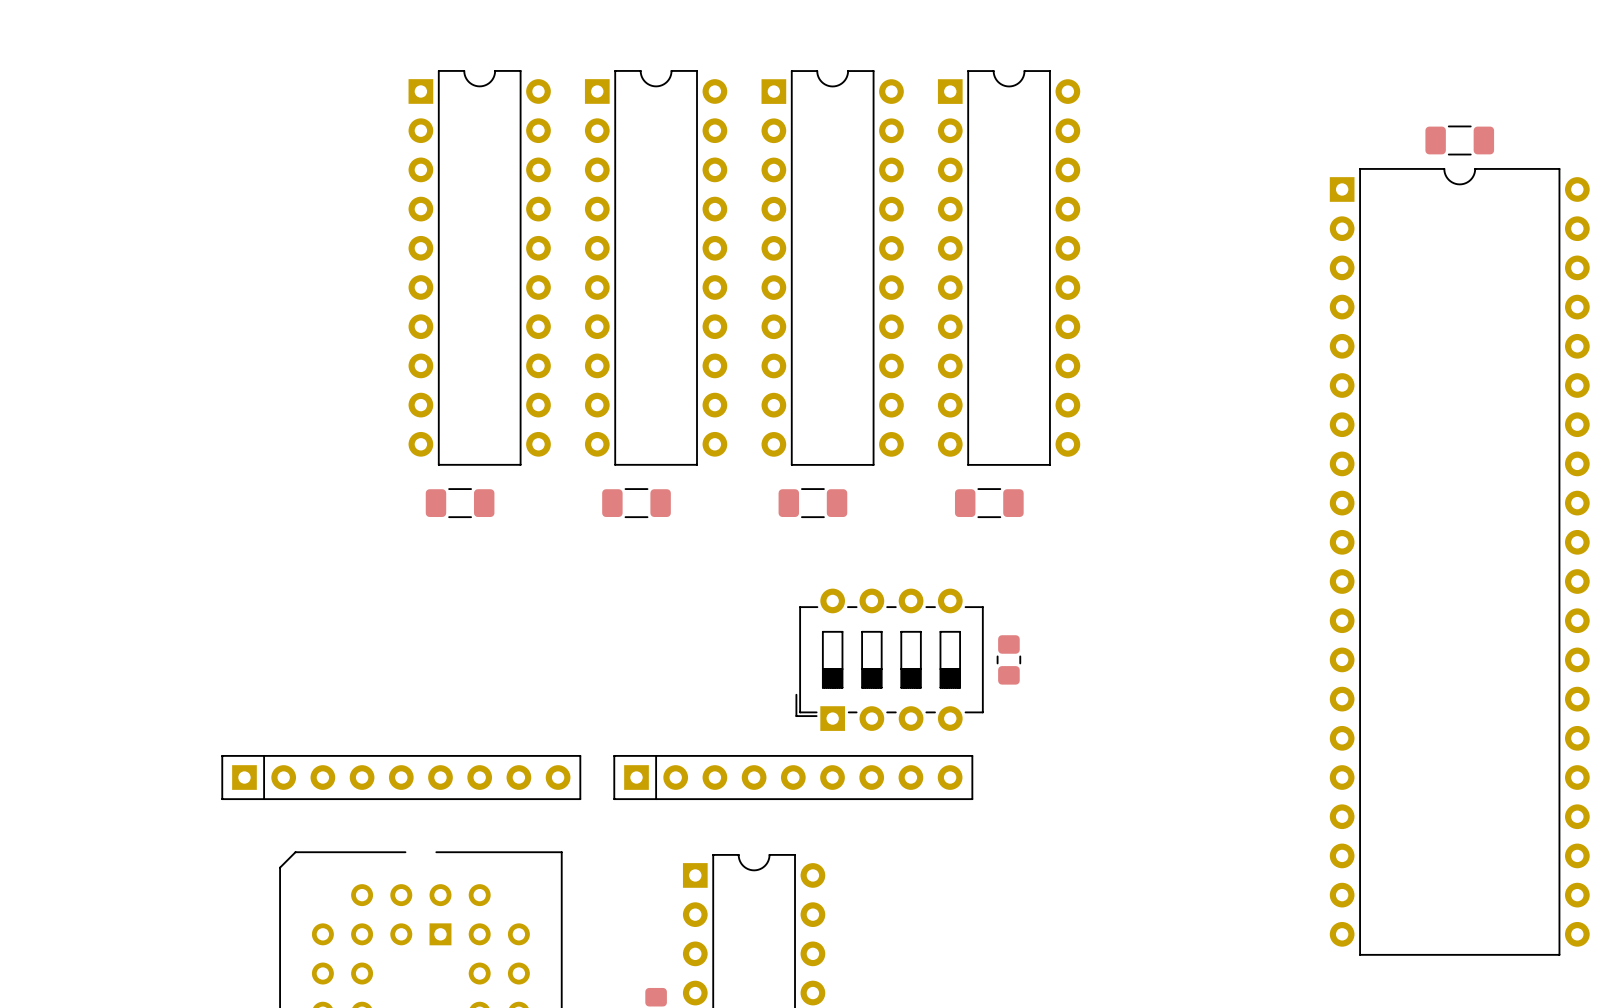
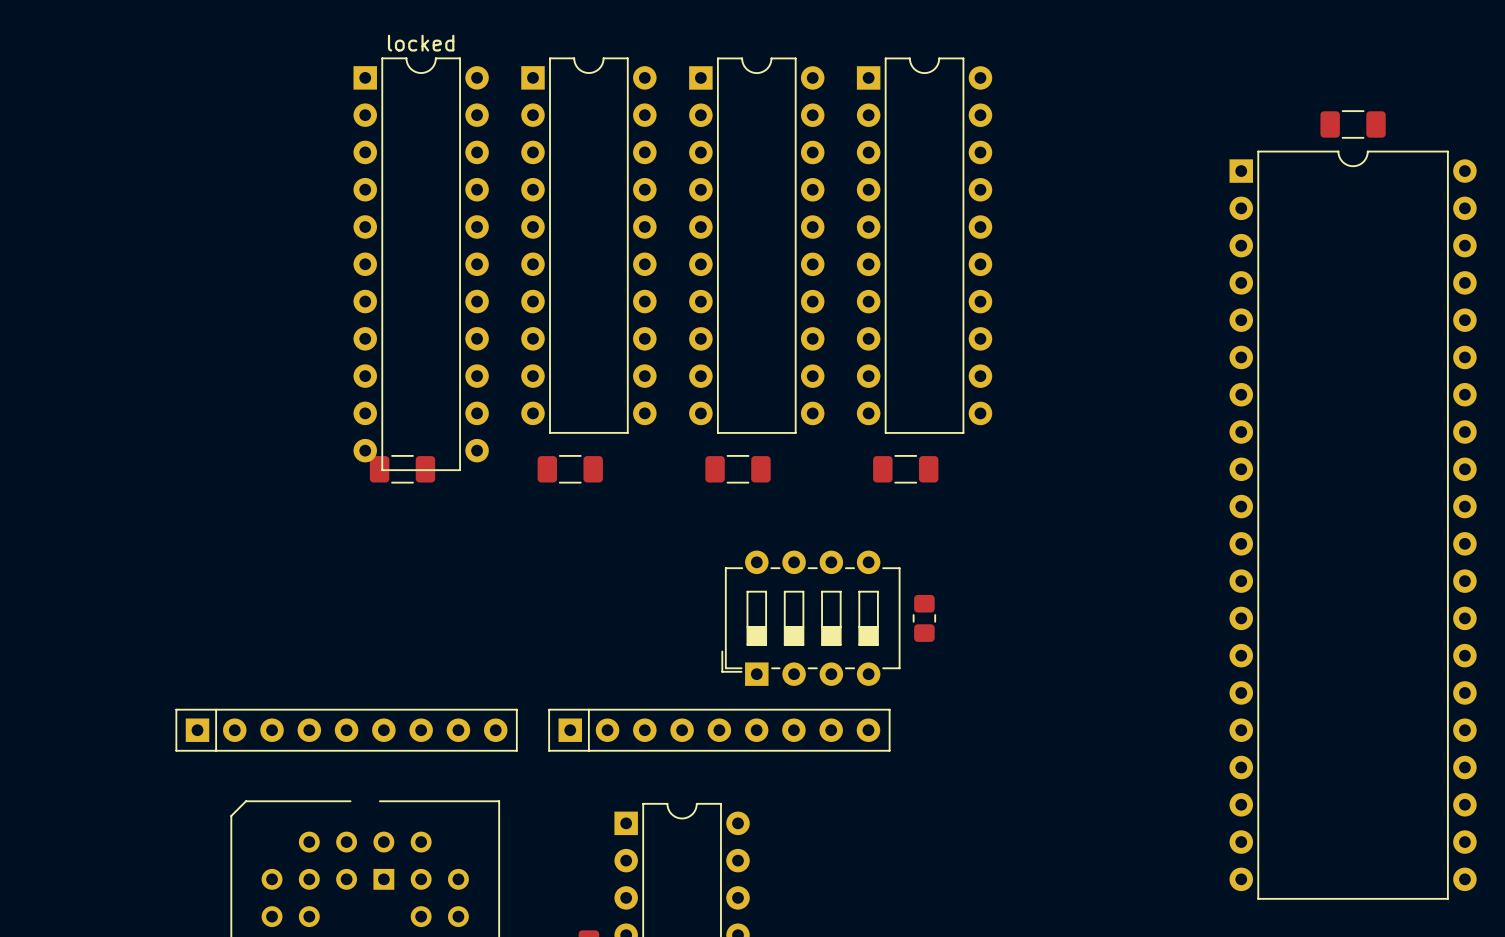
part: (479, 267) -> none
locked: none -> (421, 264)

